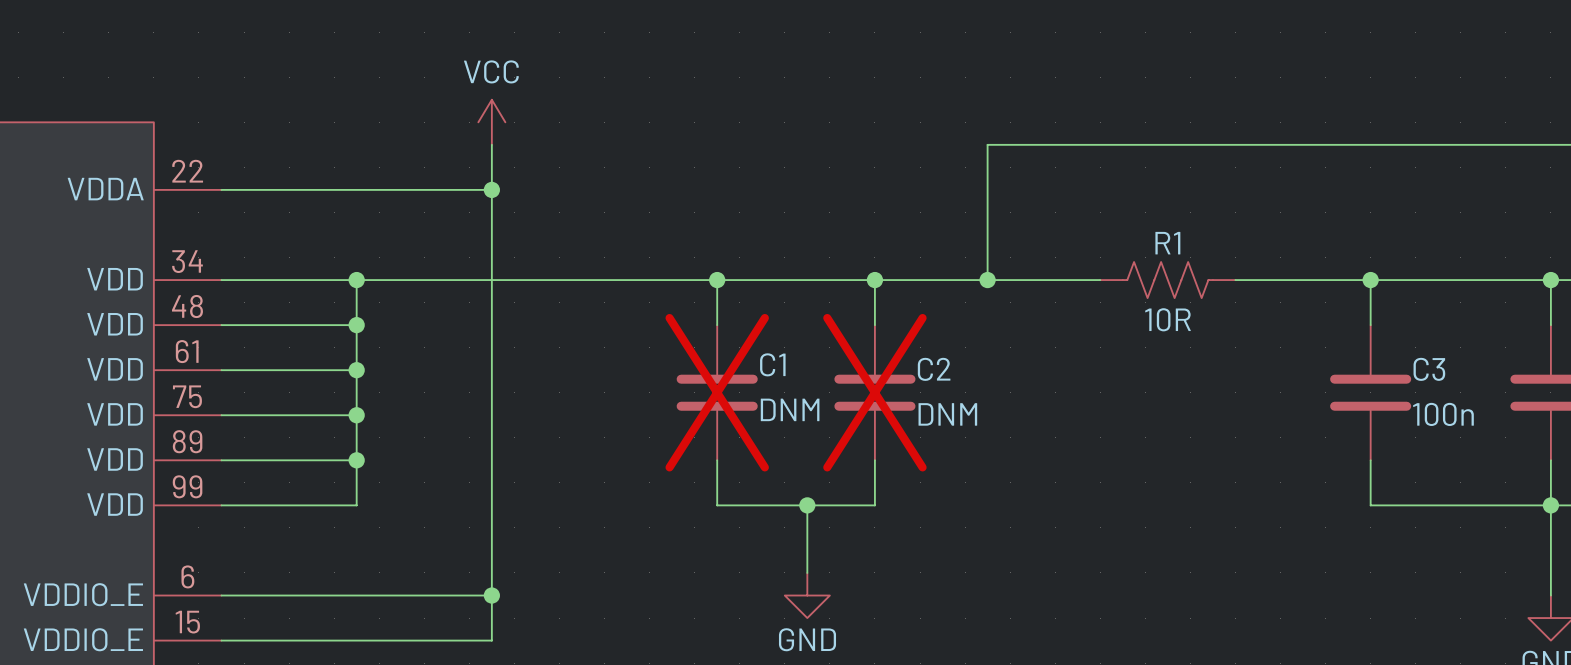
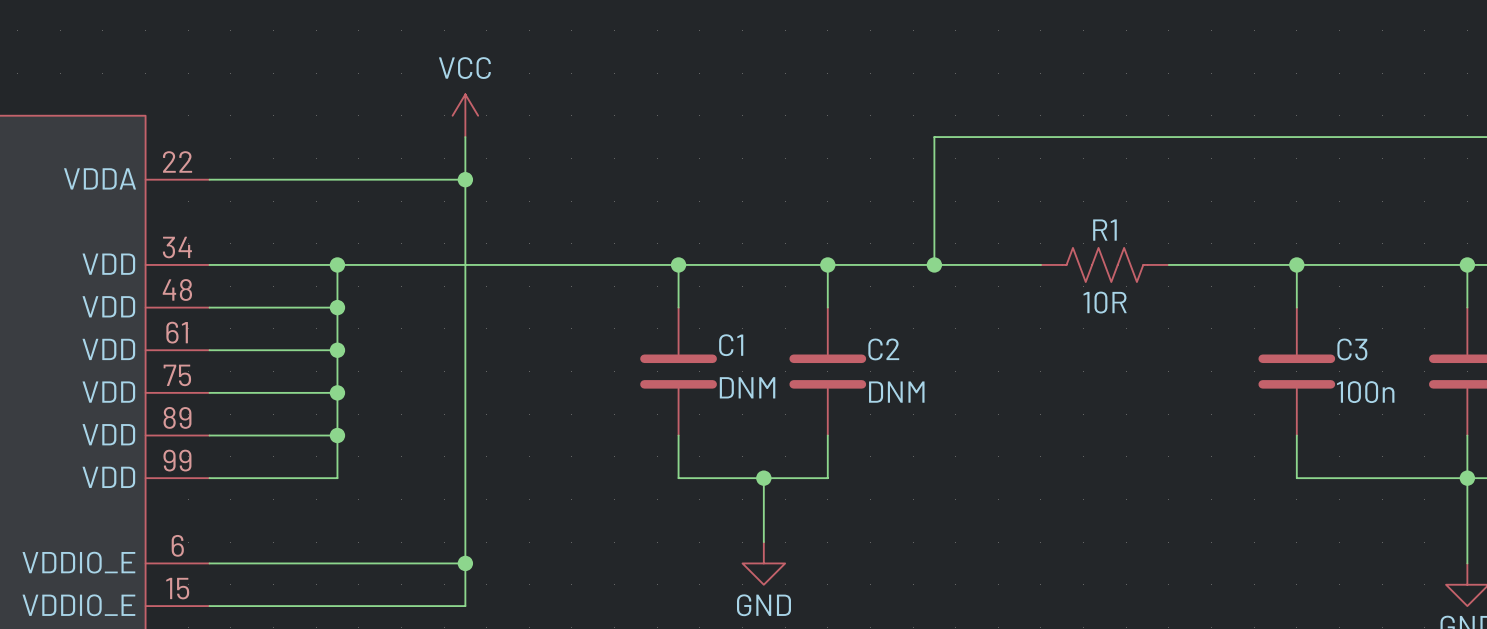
C1 do-not-place cross: (717, 392) -> none
C2 do-not-place cross: (874, 392) -> none

